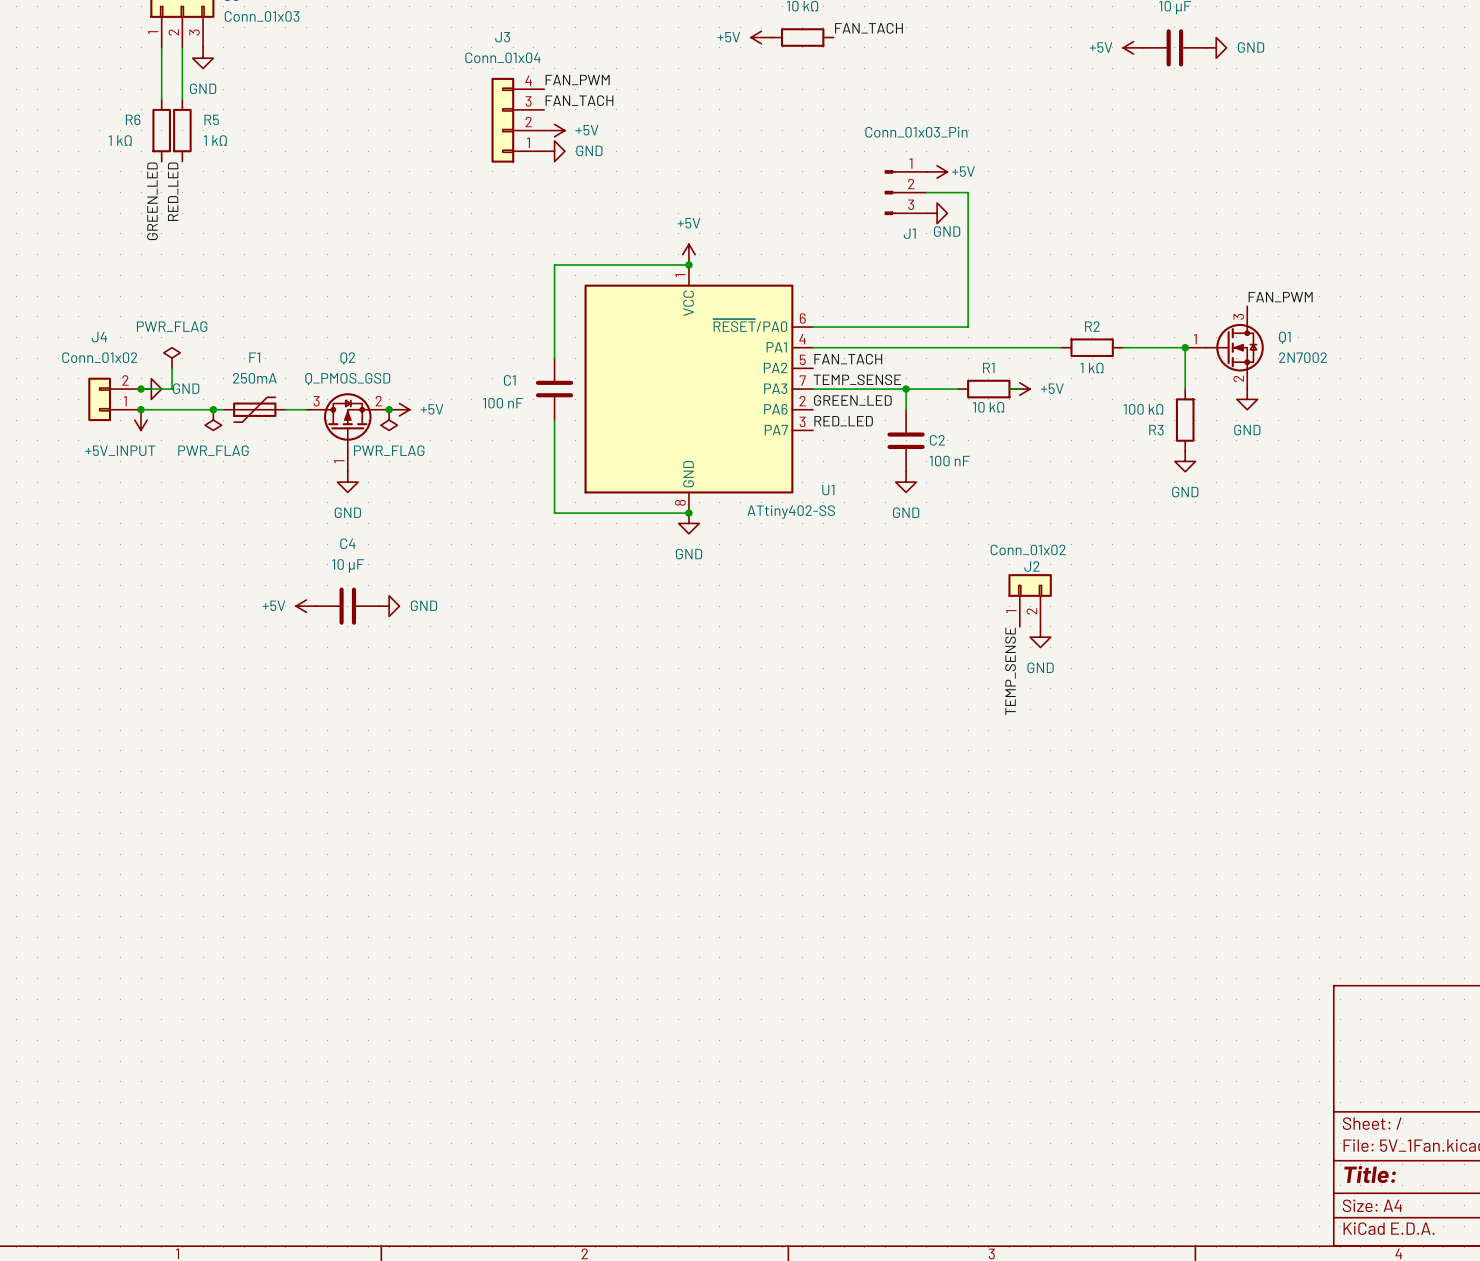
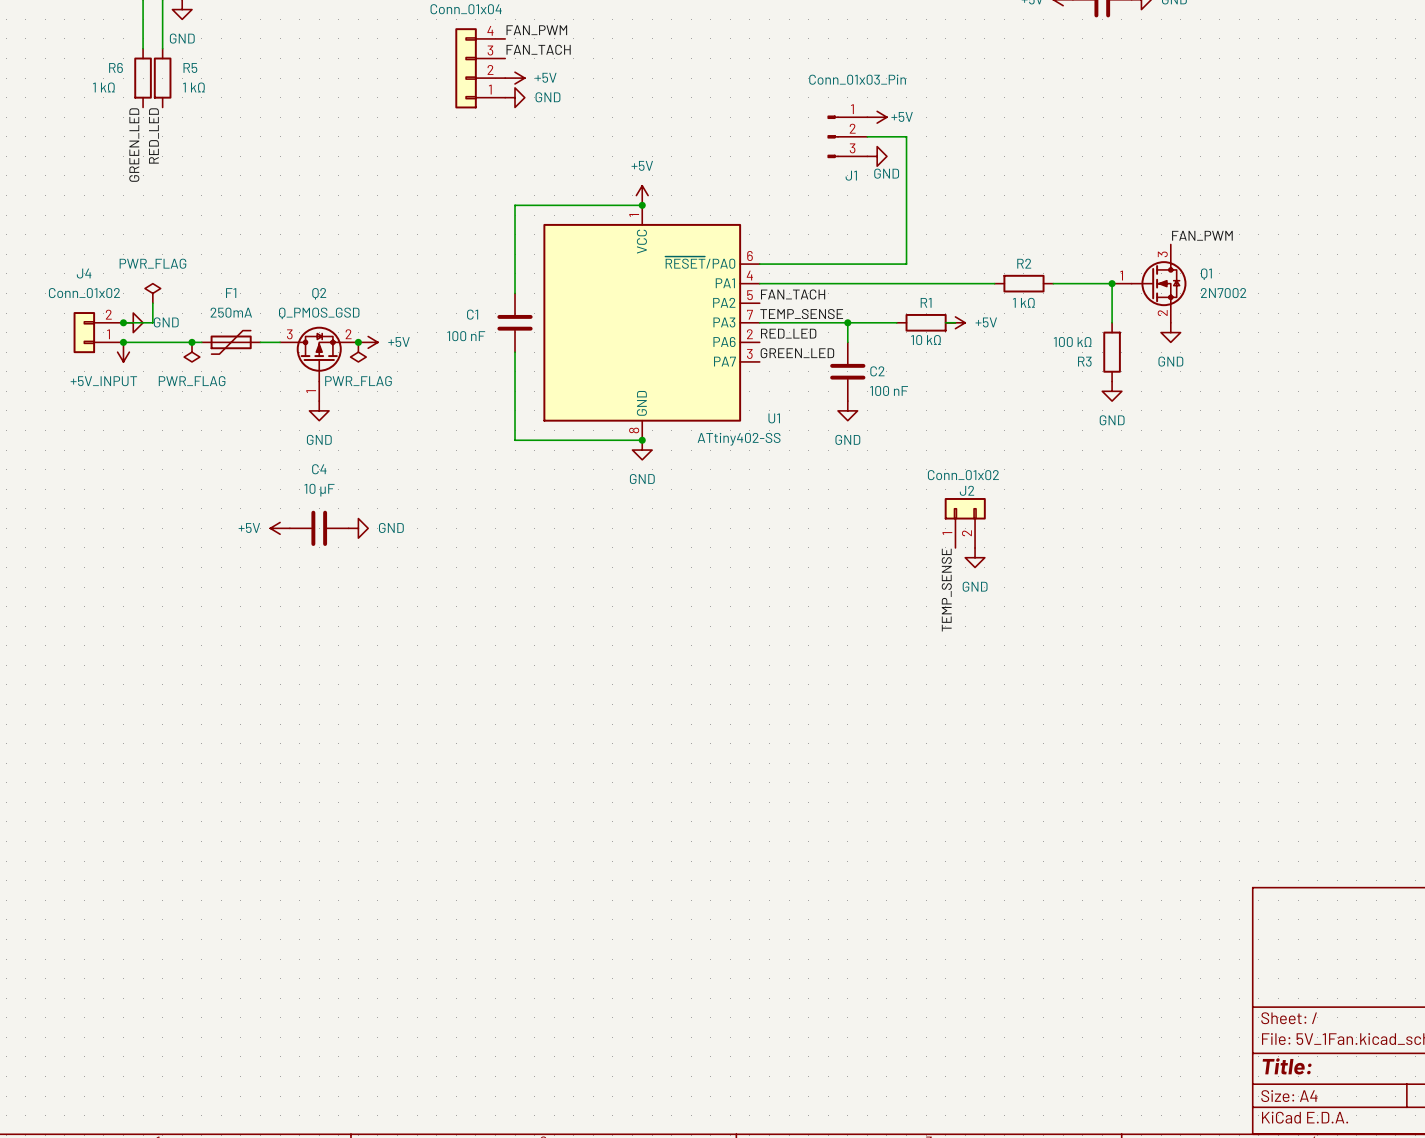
label: GREEN_LED (852, 400) -> RED_LED (788, 333)
label: RED_LED (843, 421) -> GREEN_LED (797, 353)

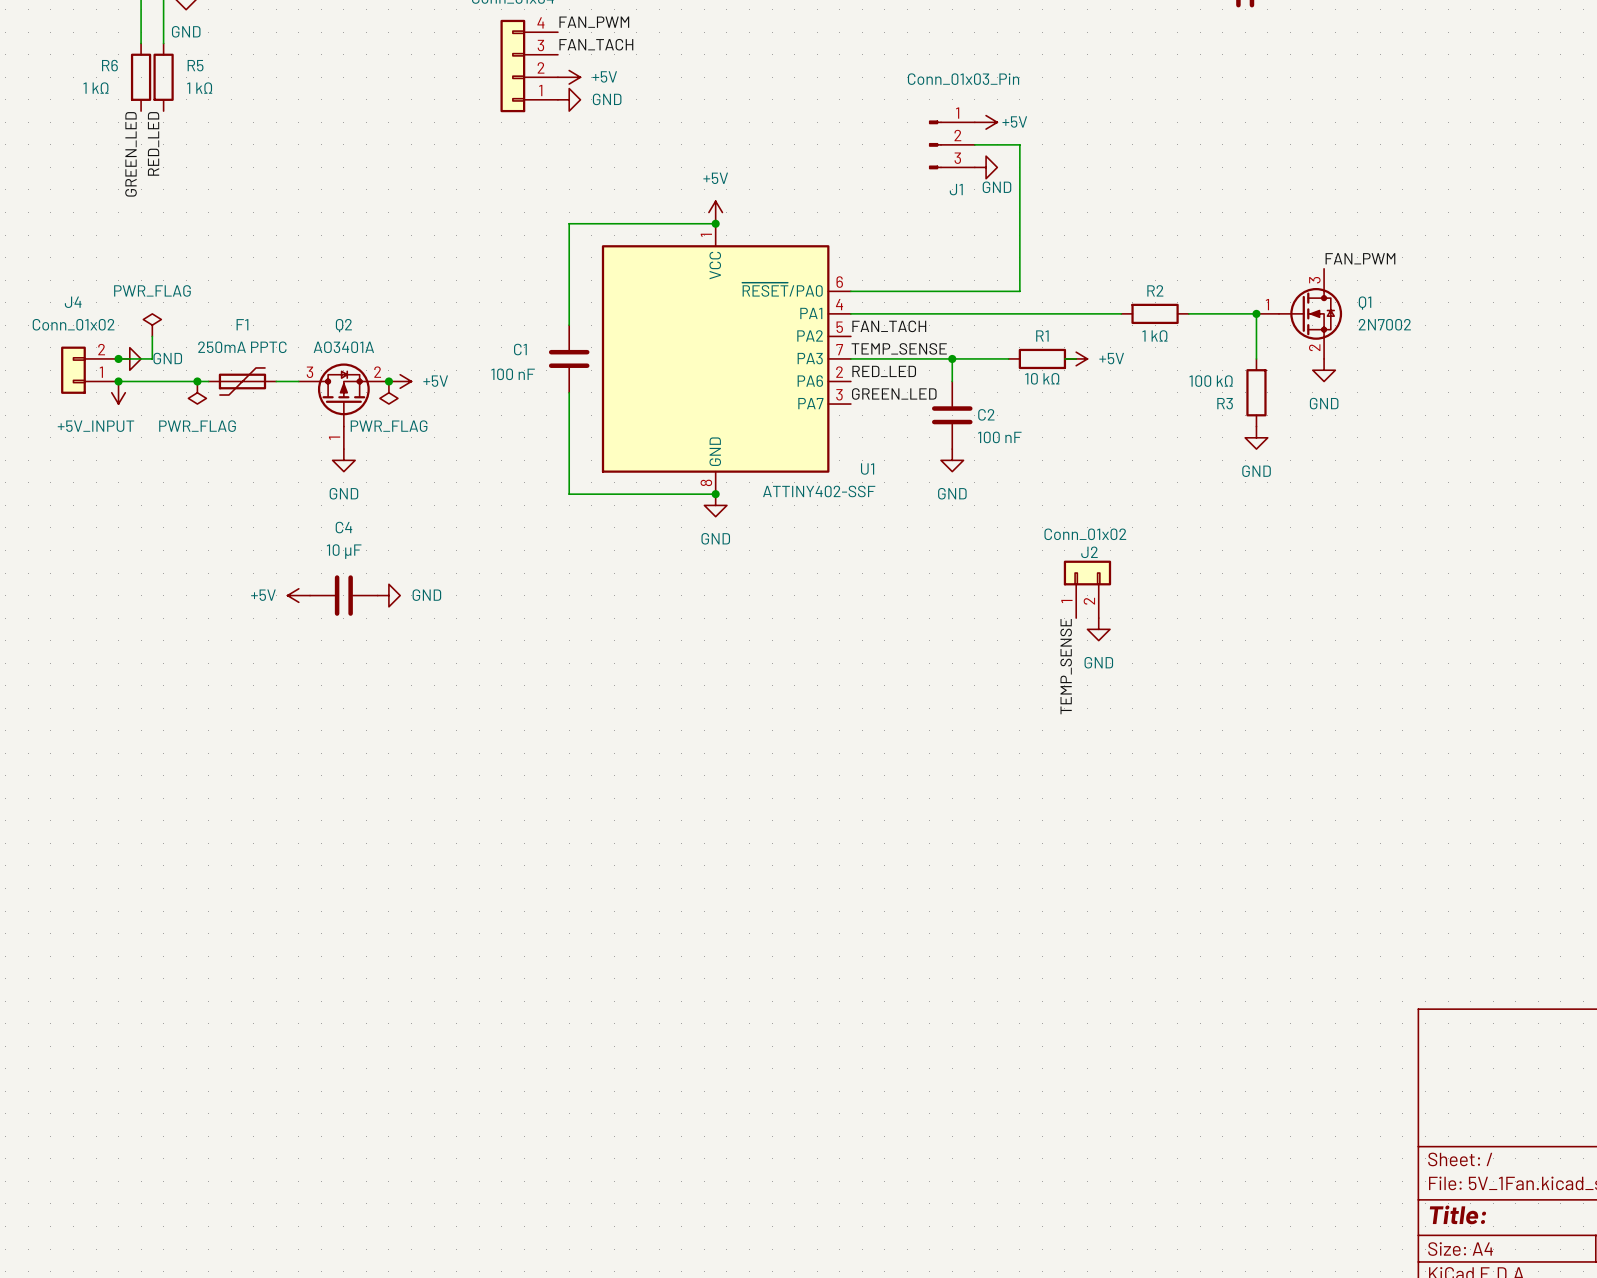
F1 value: 250mA (231, 312) -> 250mA PPTC (242, 347)
Q2 value: Q_PMOS_GSD (319, 313) -> AO3401A (343, 347)
U1 value: ATtiny402-SS (739, 439) -> ATTINY402-SSF (819, 491)

